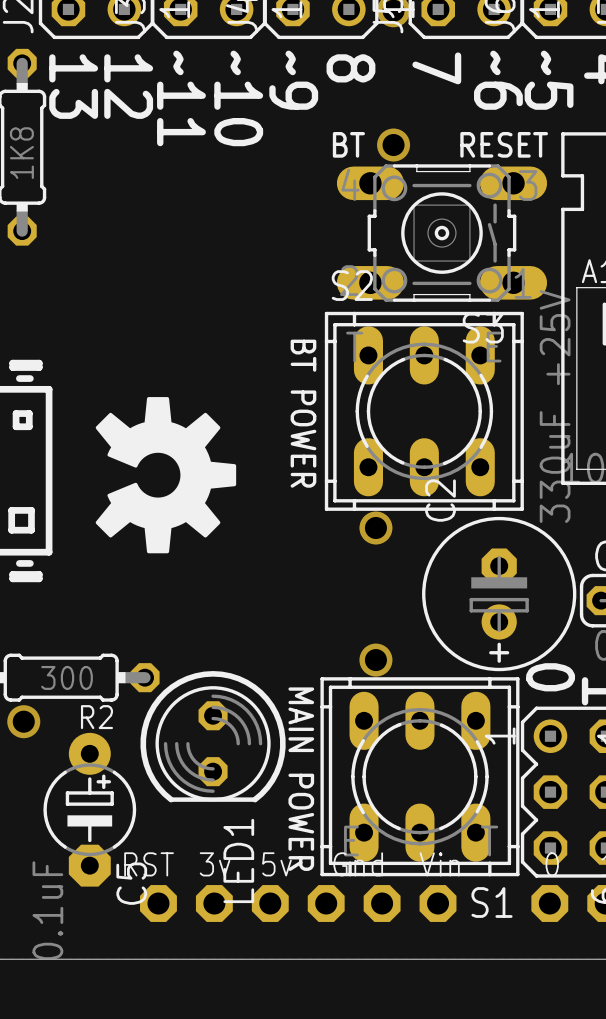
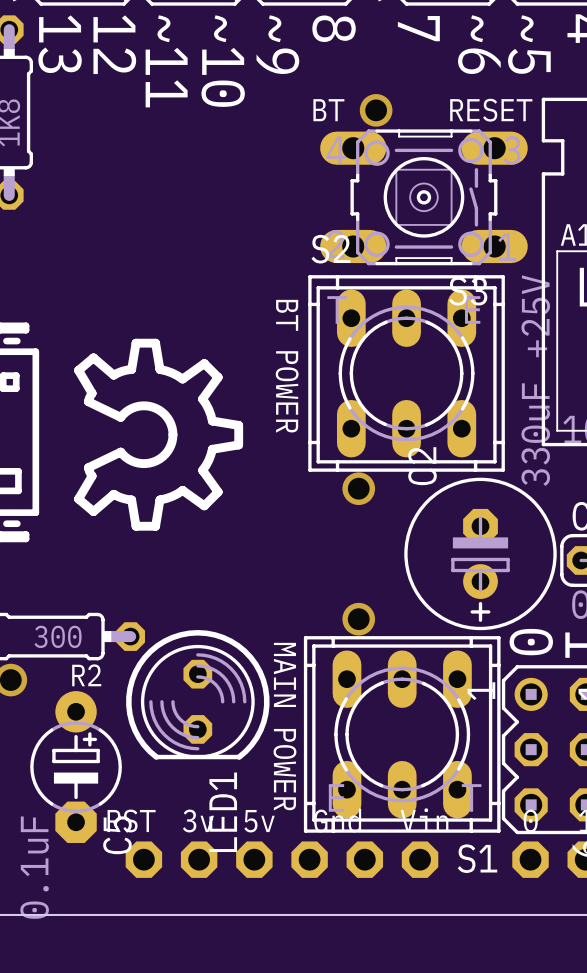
drawing shape: [95, 397, 237, 554] -> [74, 338, 244, 531]

